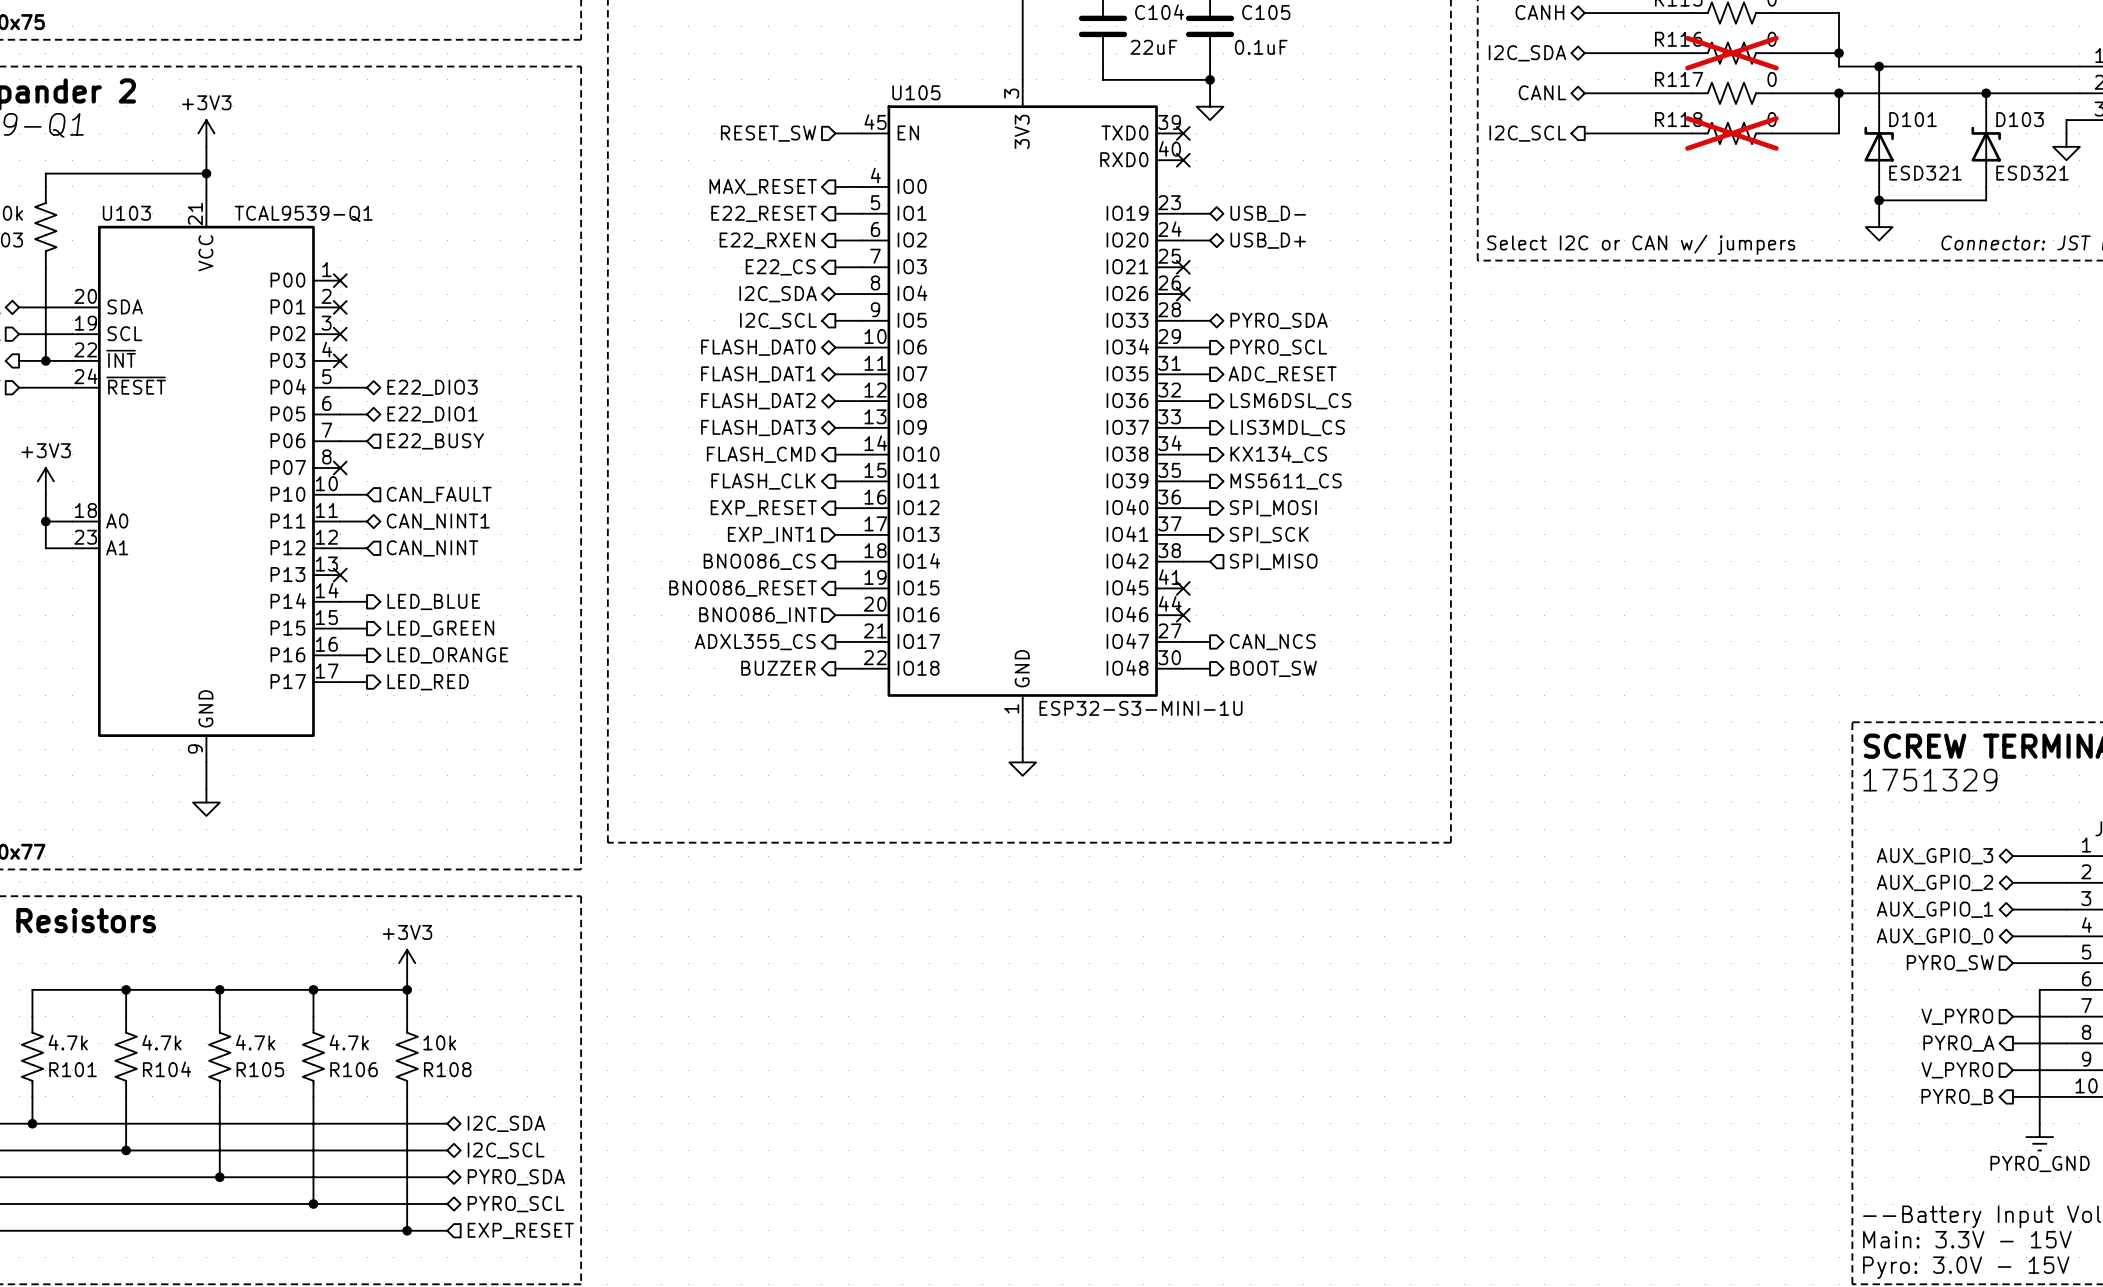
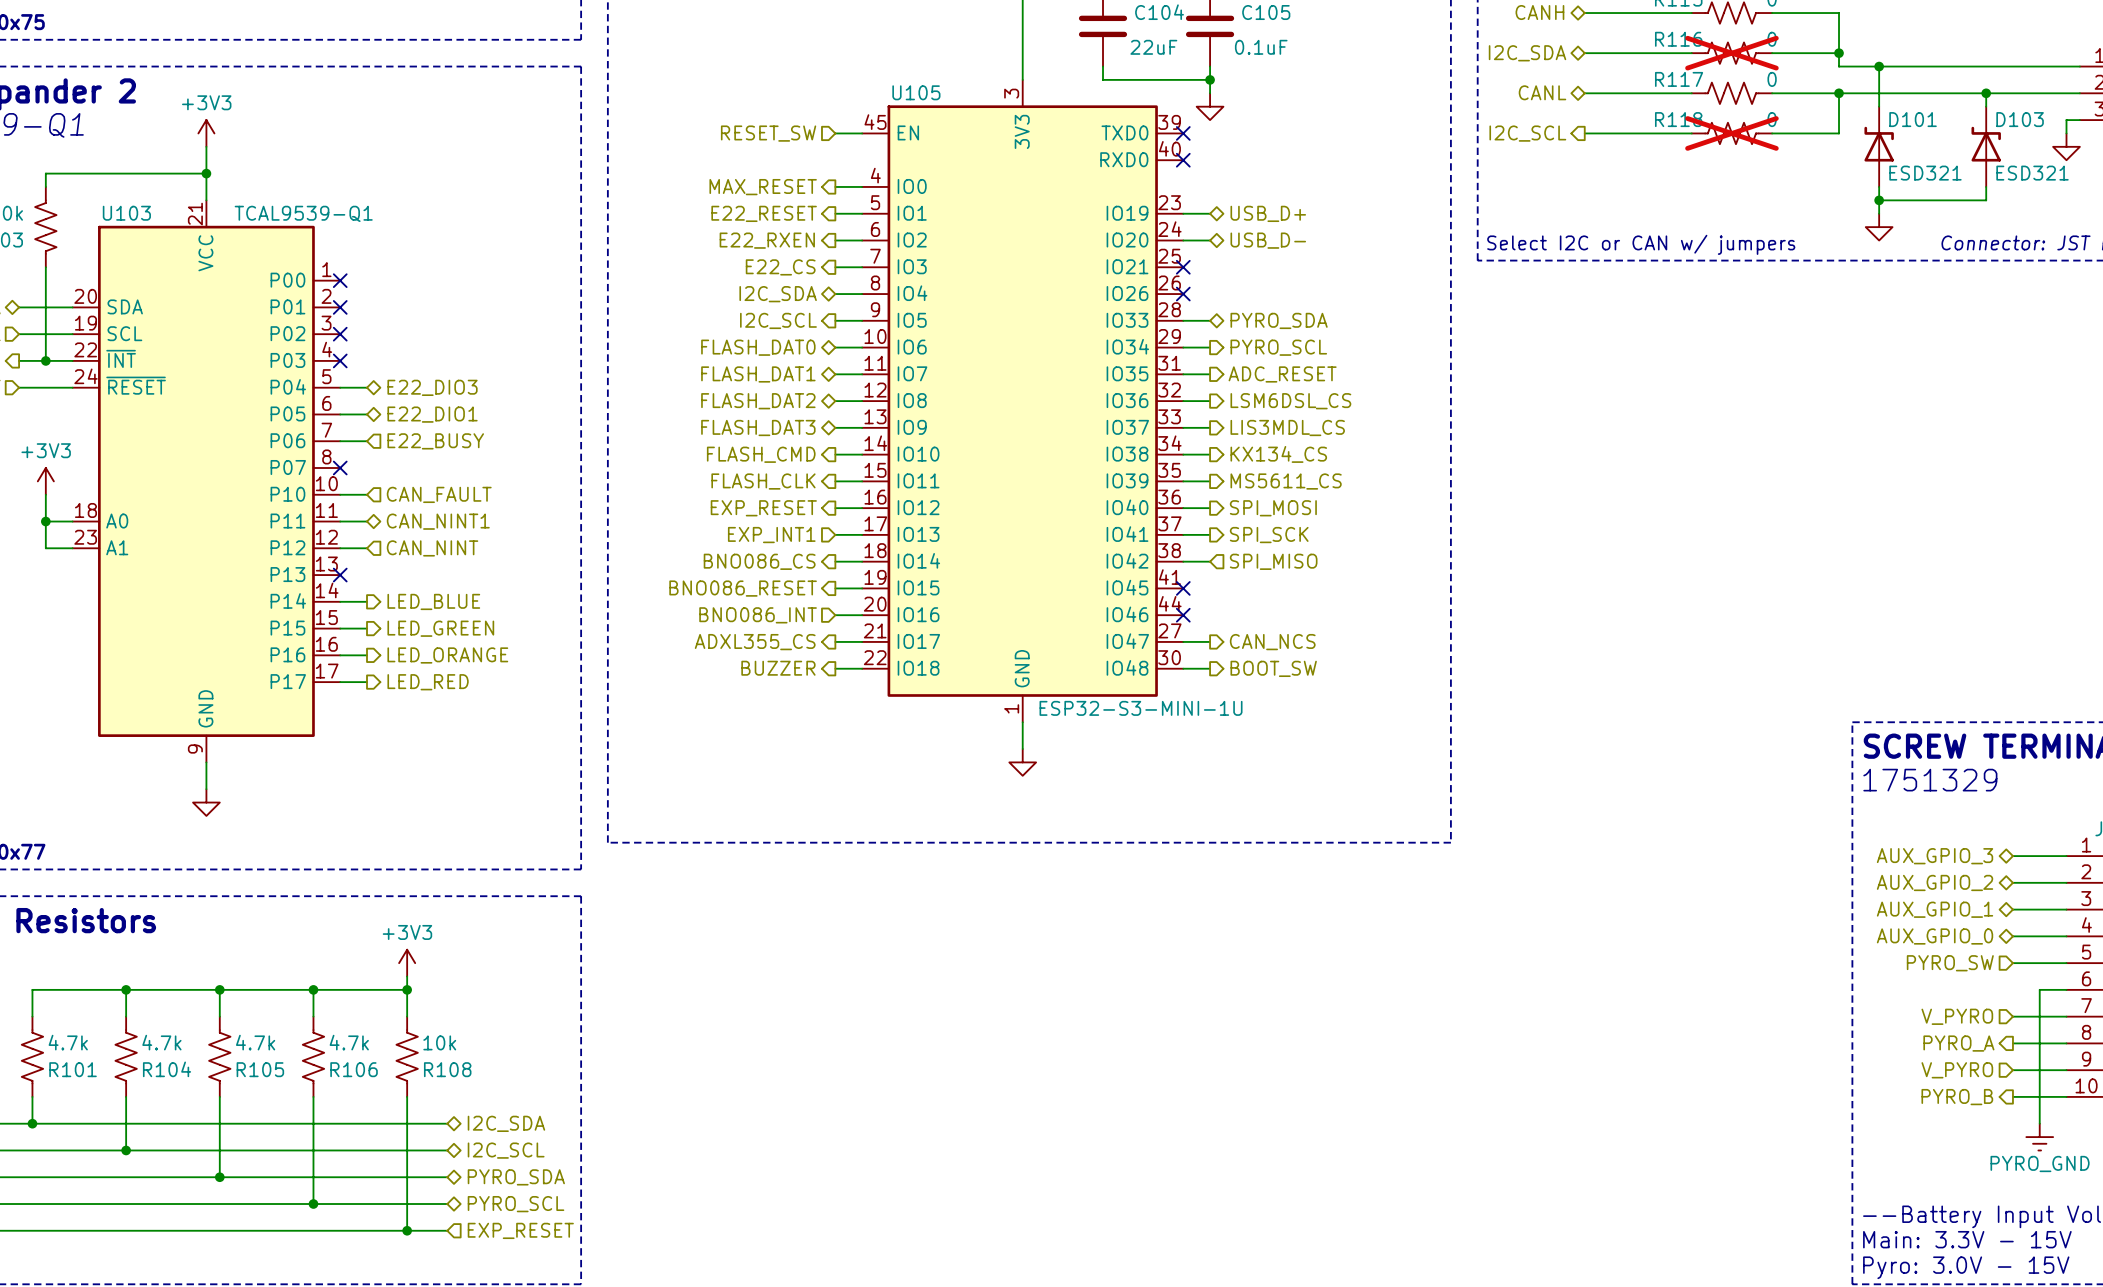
hierarchical label: USB_D- (1268, 213) -> USB_D+ (1268, 213)
hierarchical label: USB_D+ (1268, 240) -> USB_D- (1268, 240)

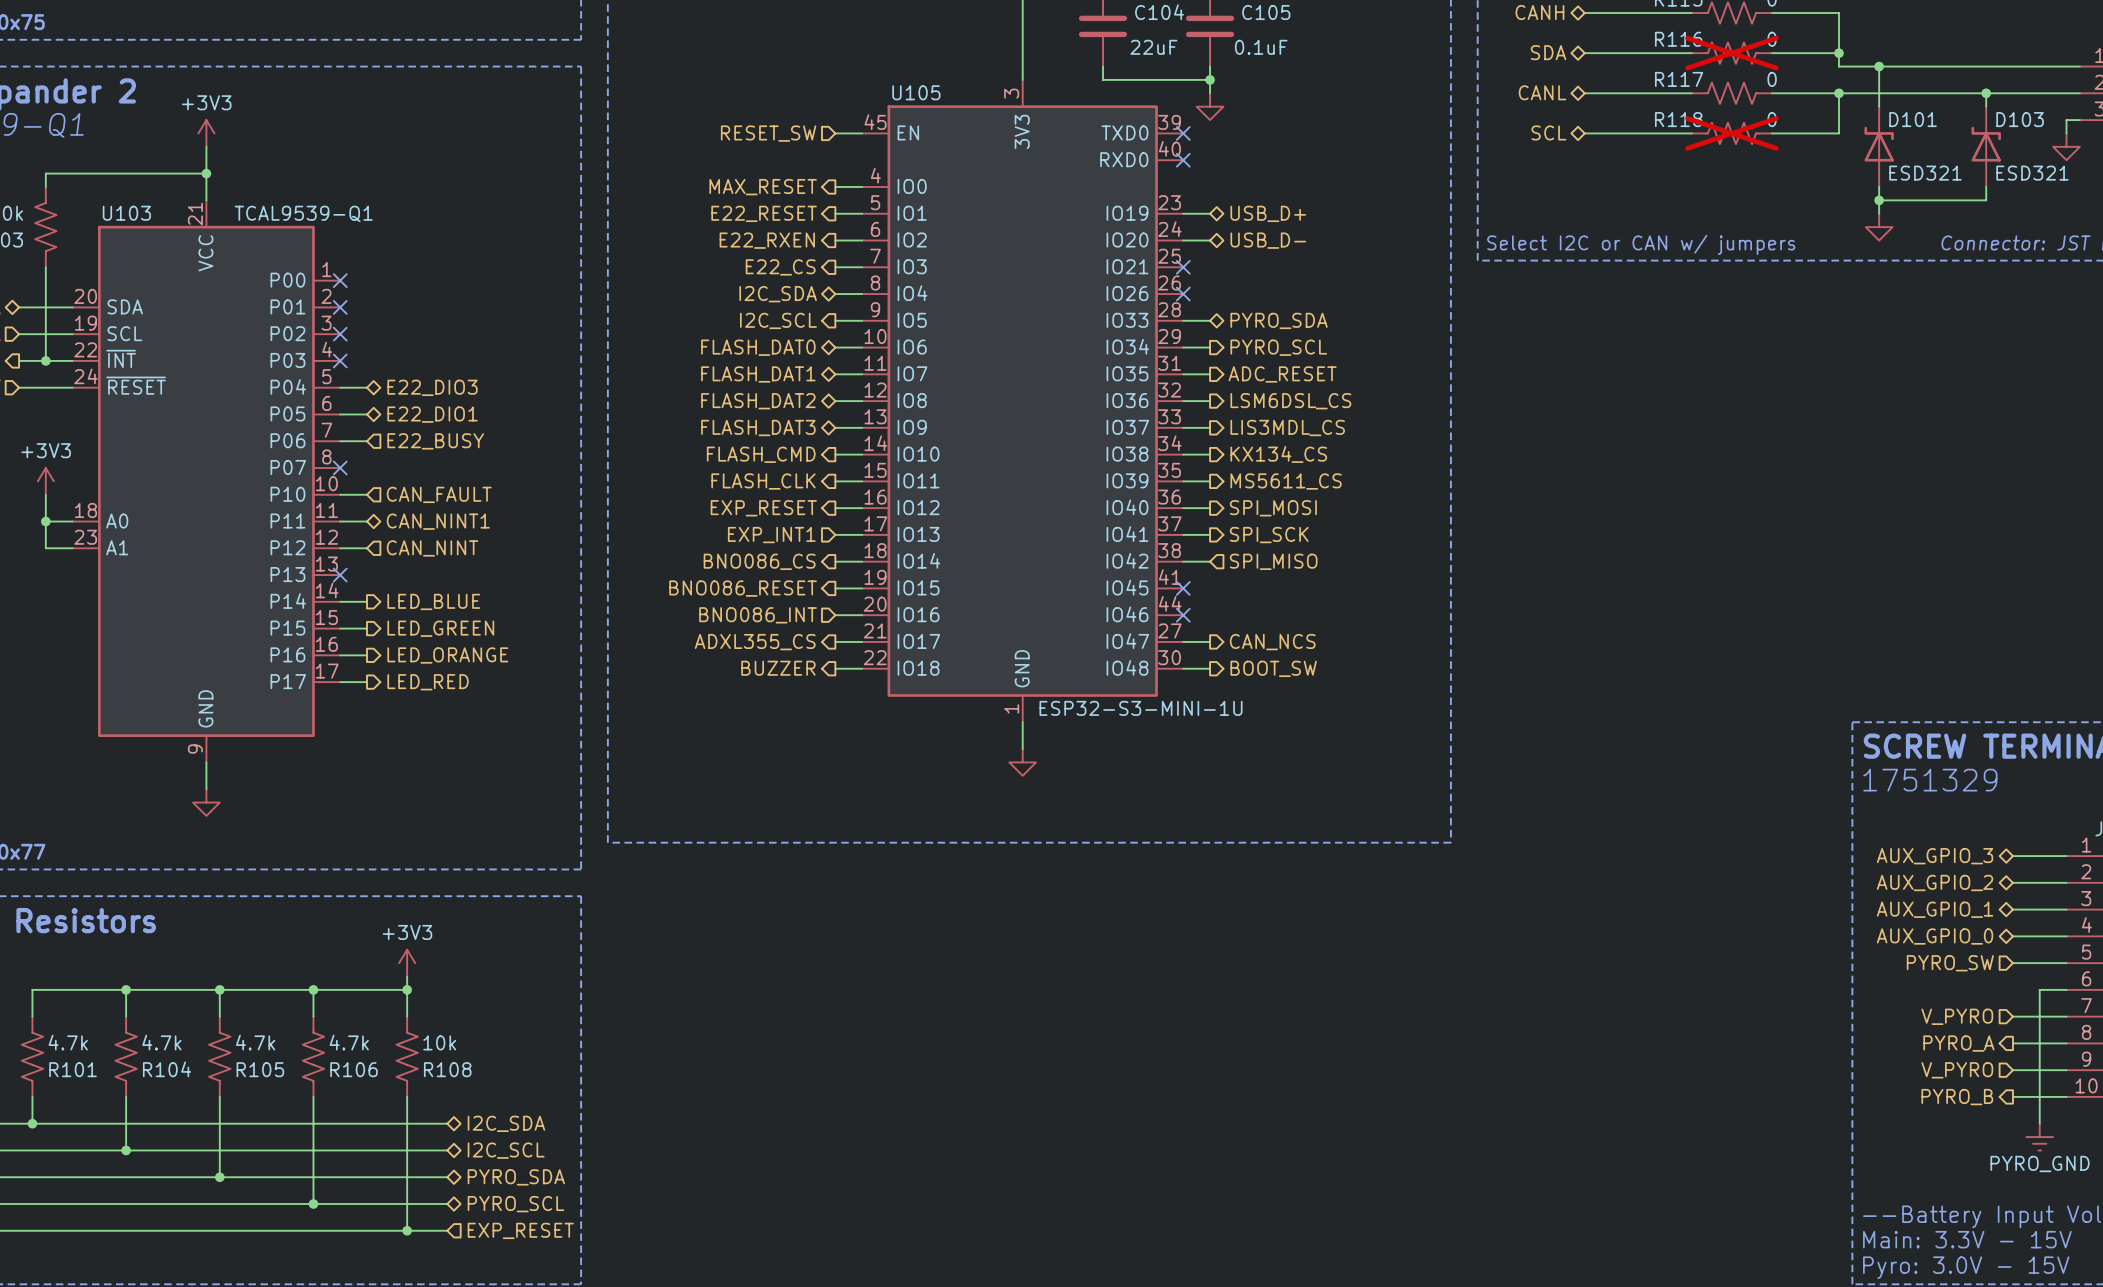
hierarchical label: I2C_SDA (1527, 53) -> SDA (1548, 52)
hierarchical label shape: output (1527, 133) -> bidirectional (1548, 132)
hierarchical label: I2C_SCL (1527, 133) -> SCL (1548, 132)

